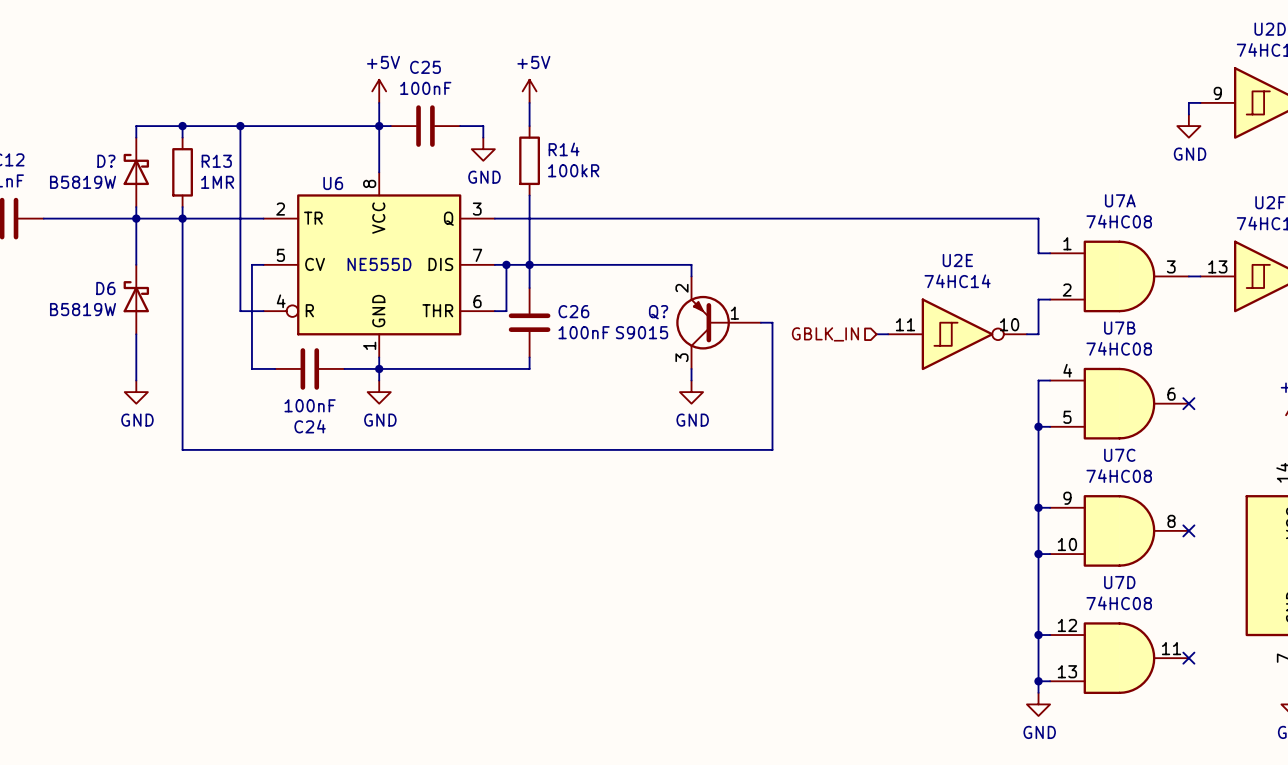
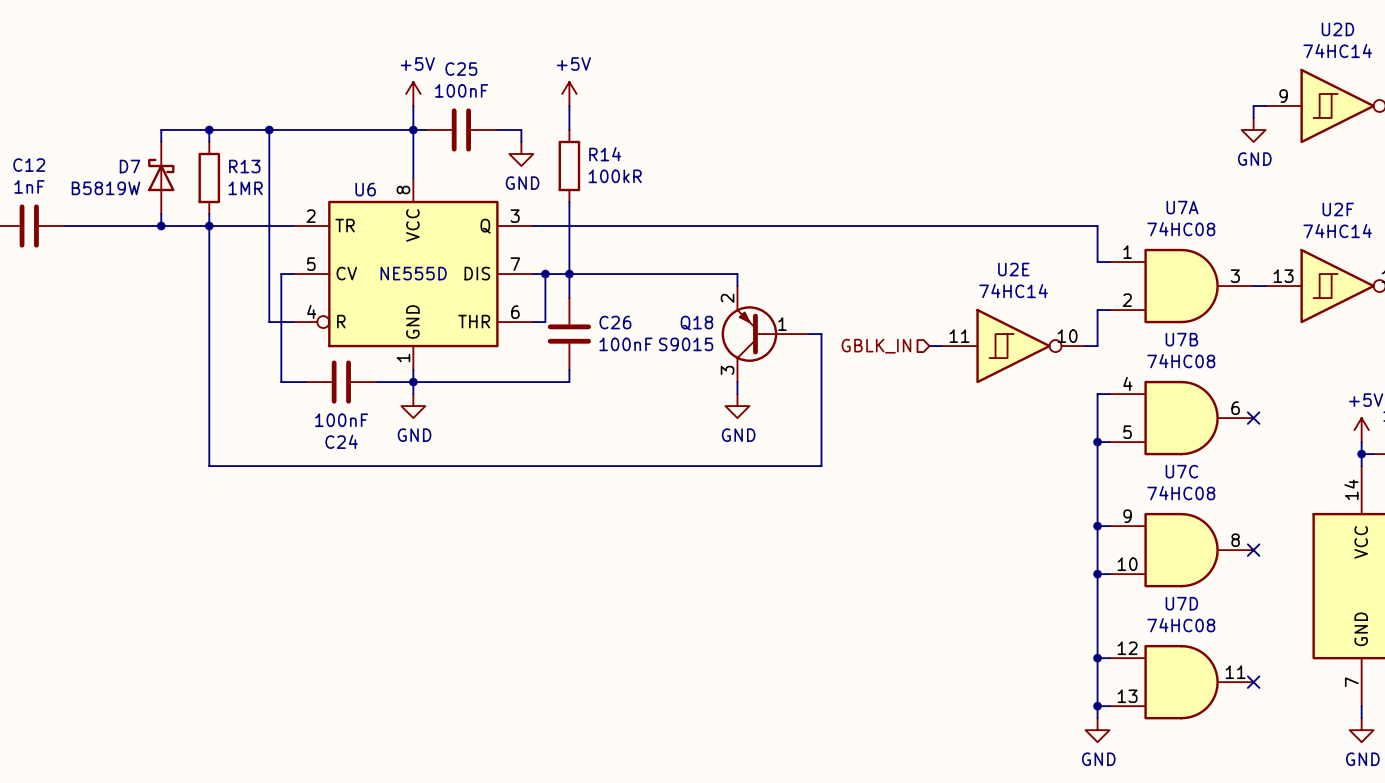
D? name: D? (106, 161) -> D7 (129, 166)
wire: (136, 218) (136, 264) -> none
D6: B5819W (136, 299) -> none
Q? name: Q? (658, 312) -> Q18 (696, 323)
wire: (136, 334) (136, 380) -> none
power symbol: GND (136, 392) -> none

